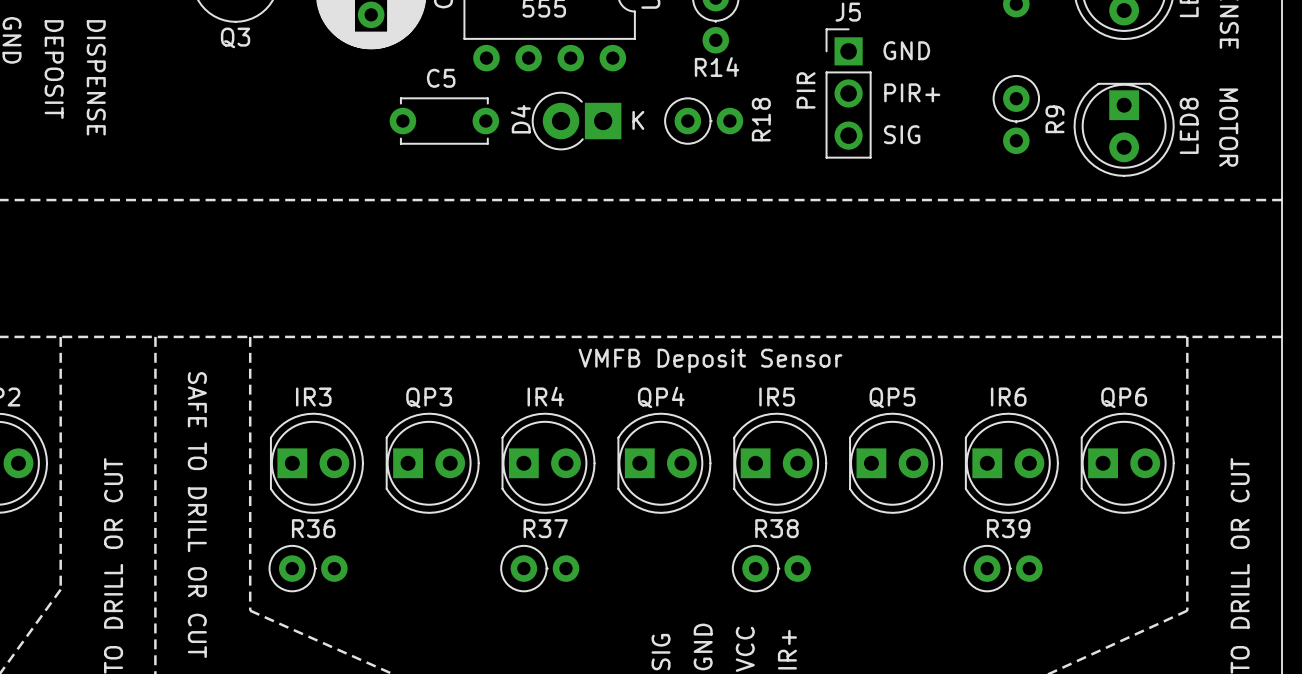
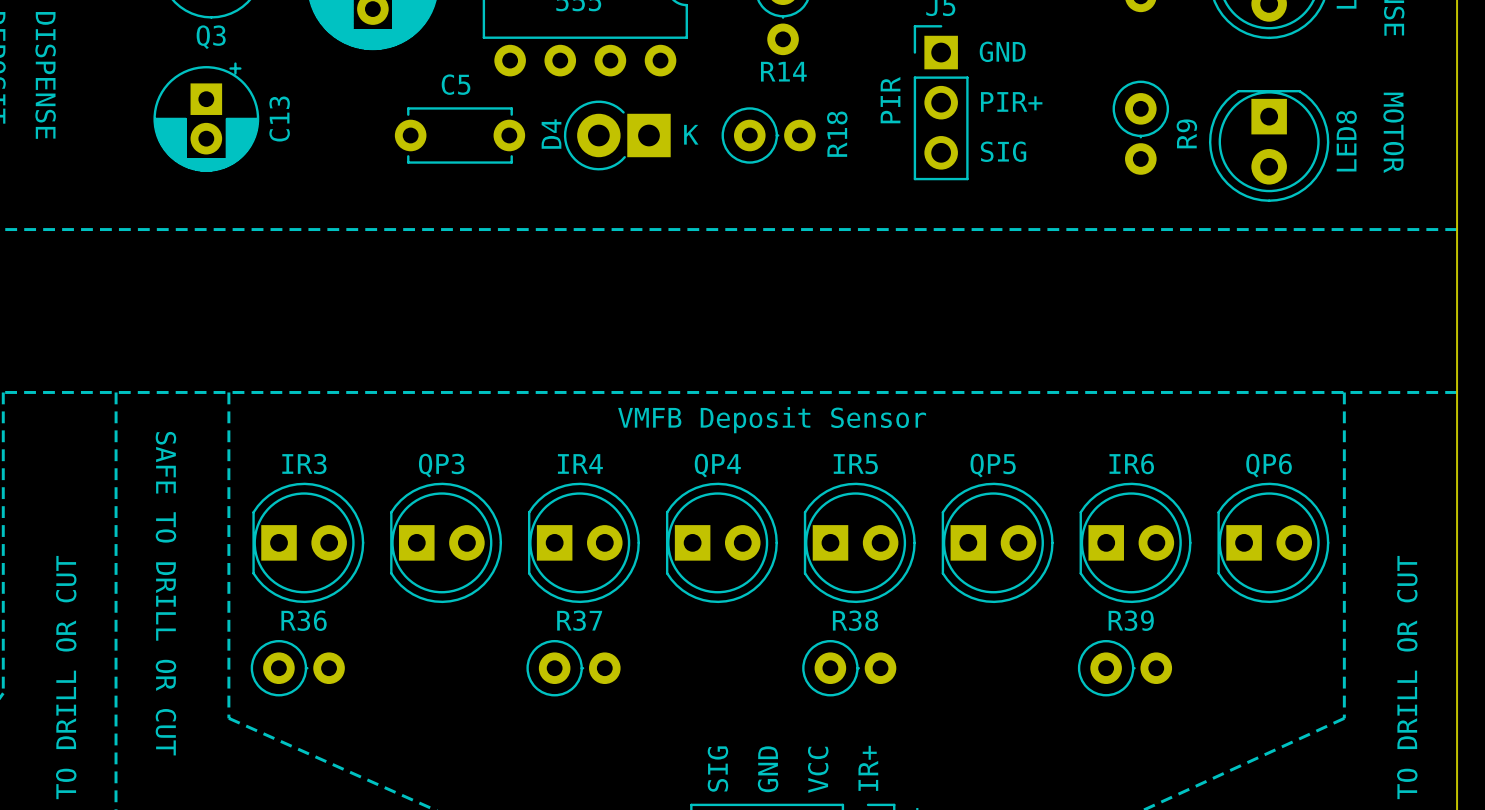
C13: none -> (206, 117)

